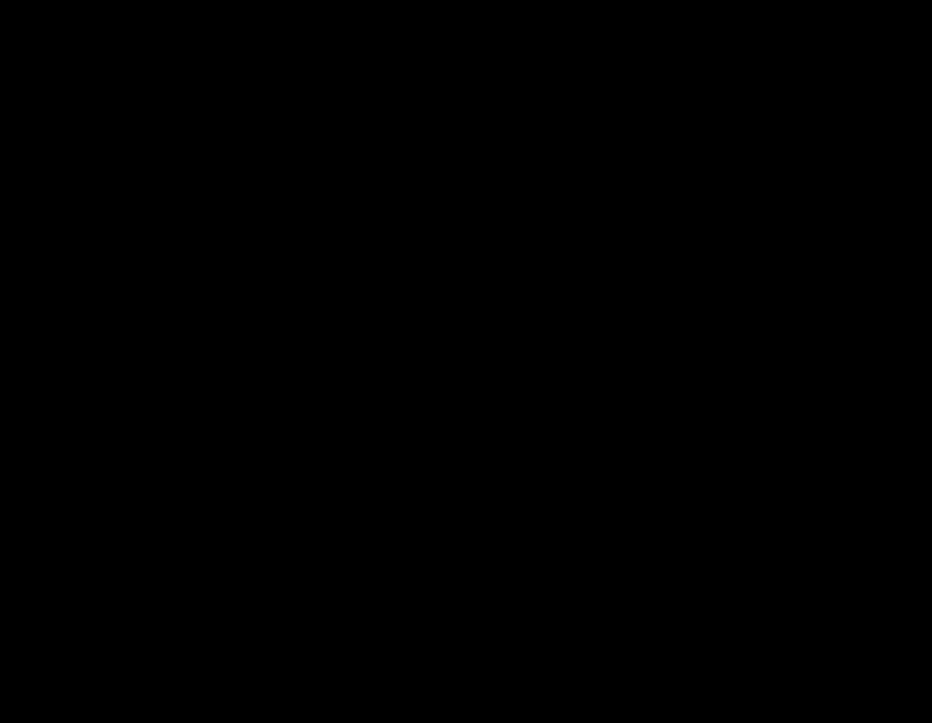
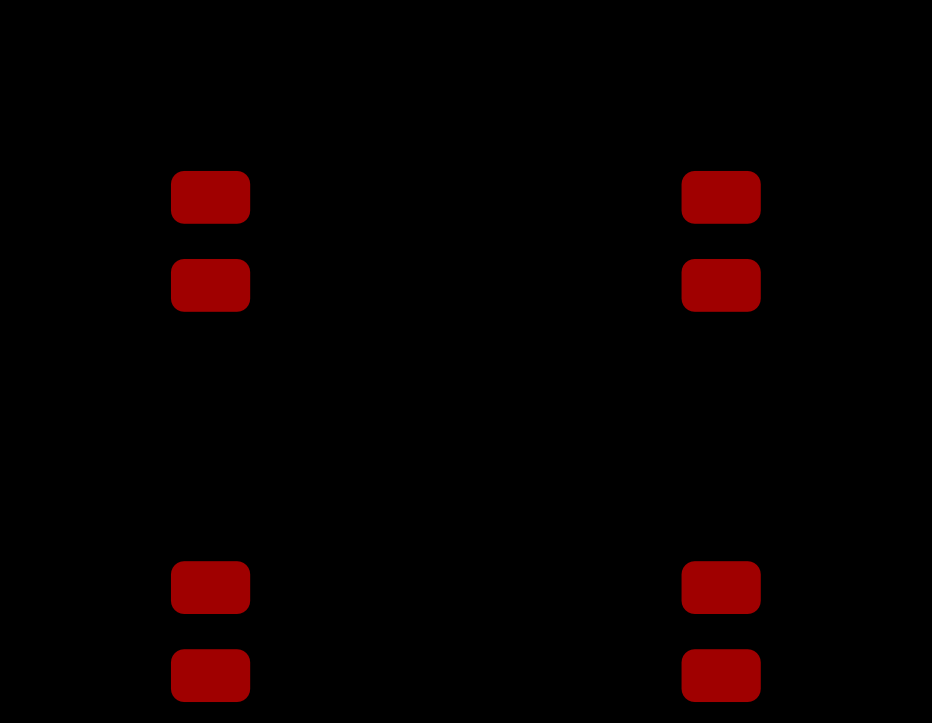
part: none -> (210, 241)
part: none -> (721, 241)
part: none -> (210, 631)
part: none -> (721, 631)

